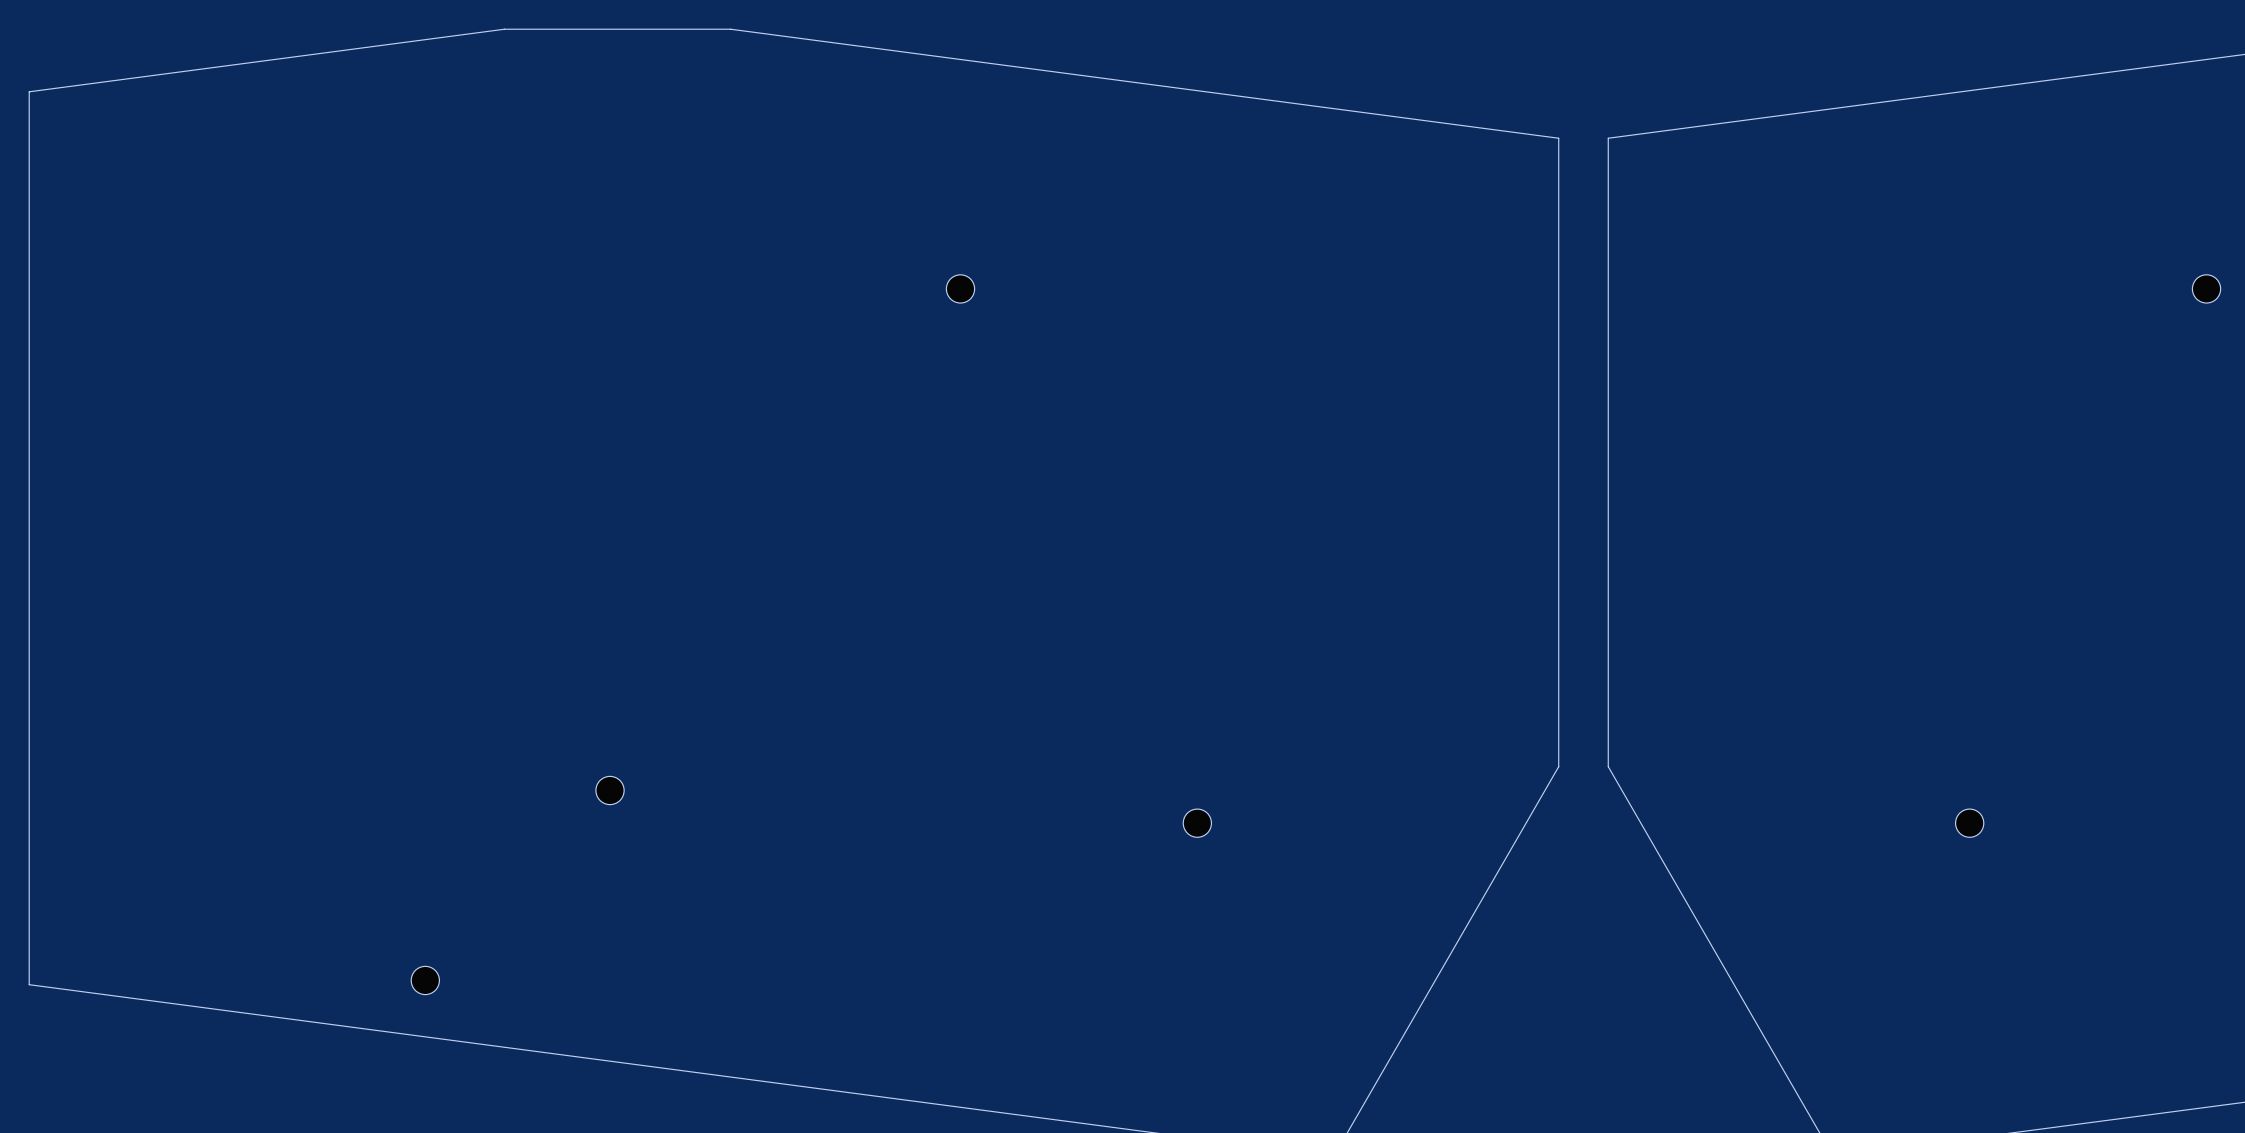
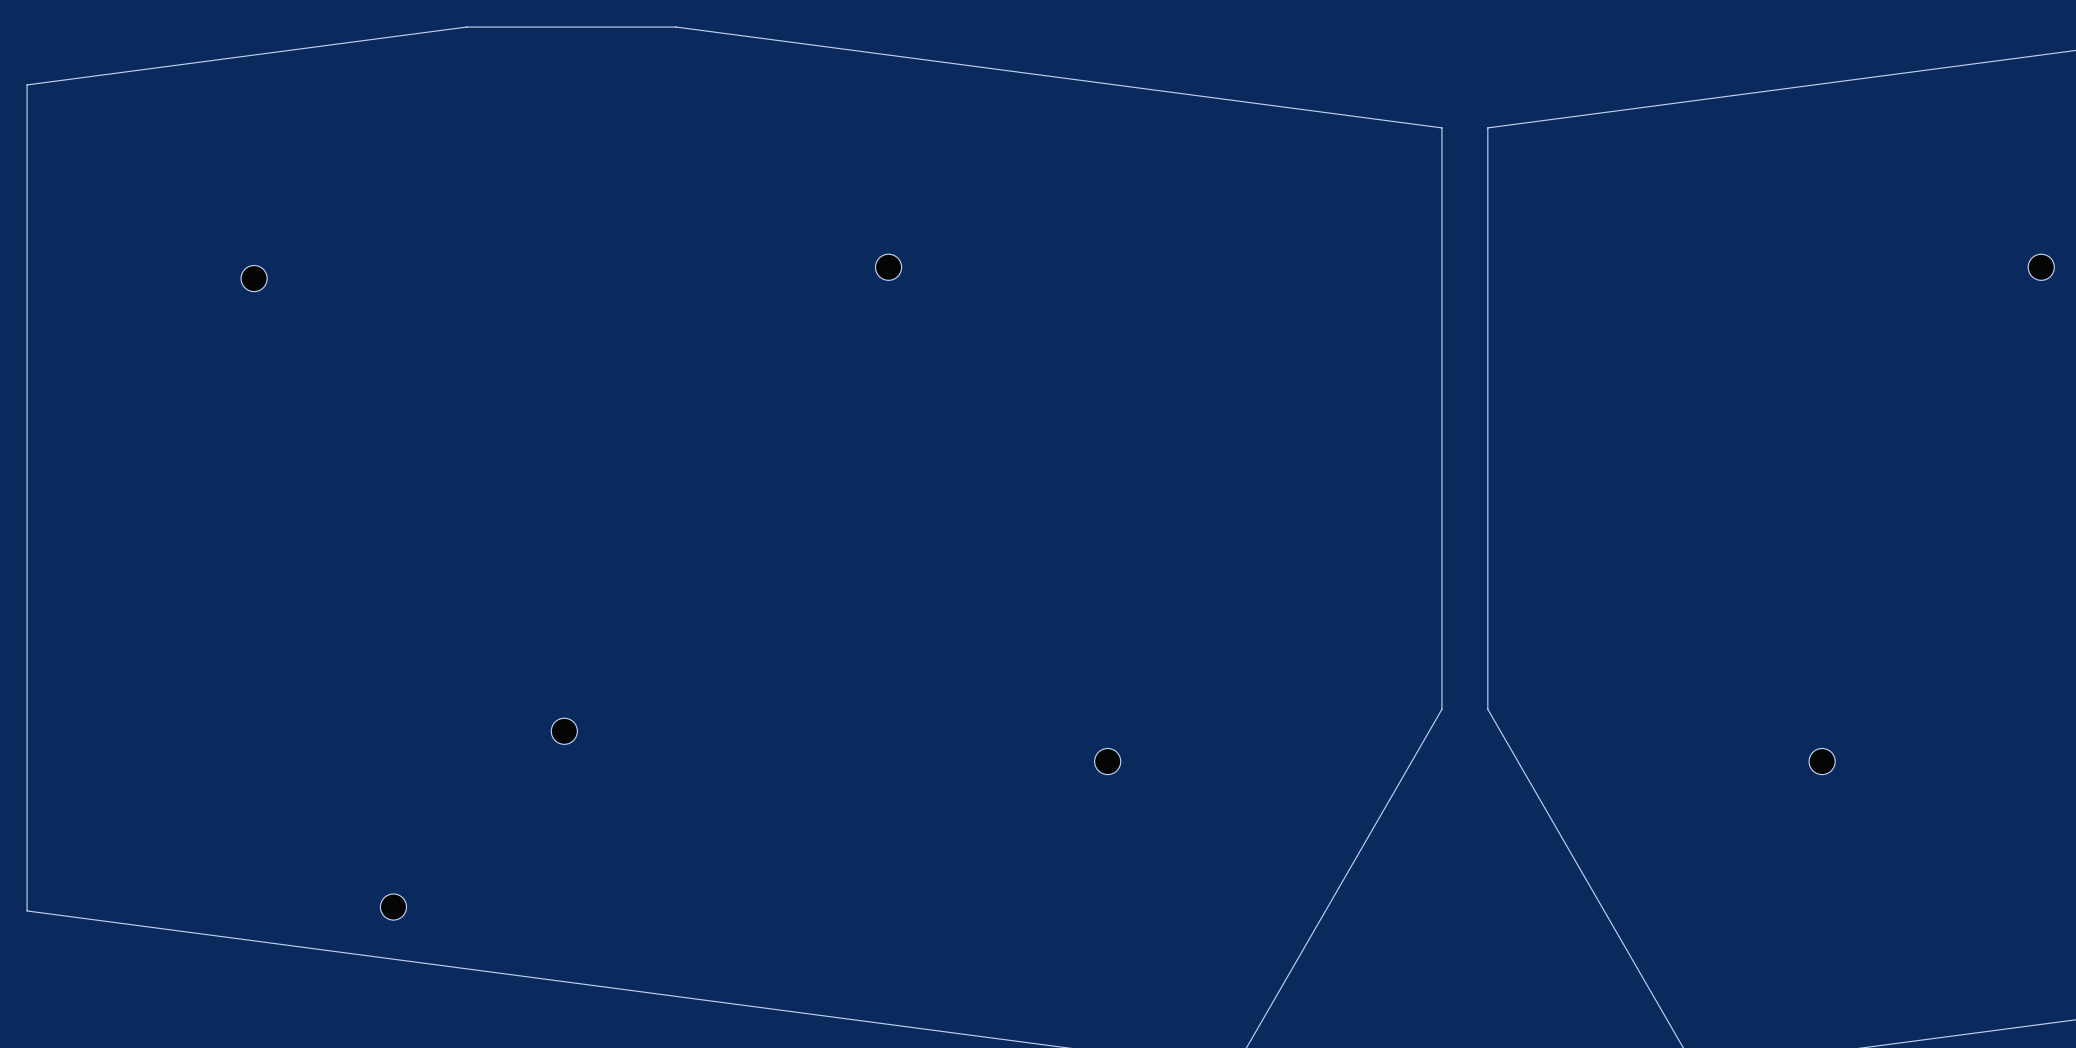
part: none -> (254, 278)

